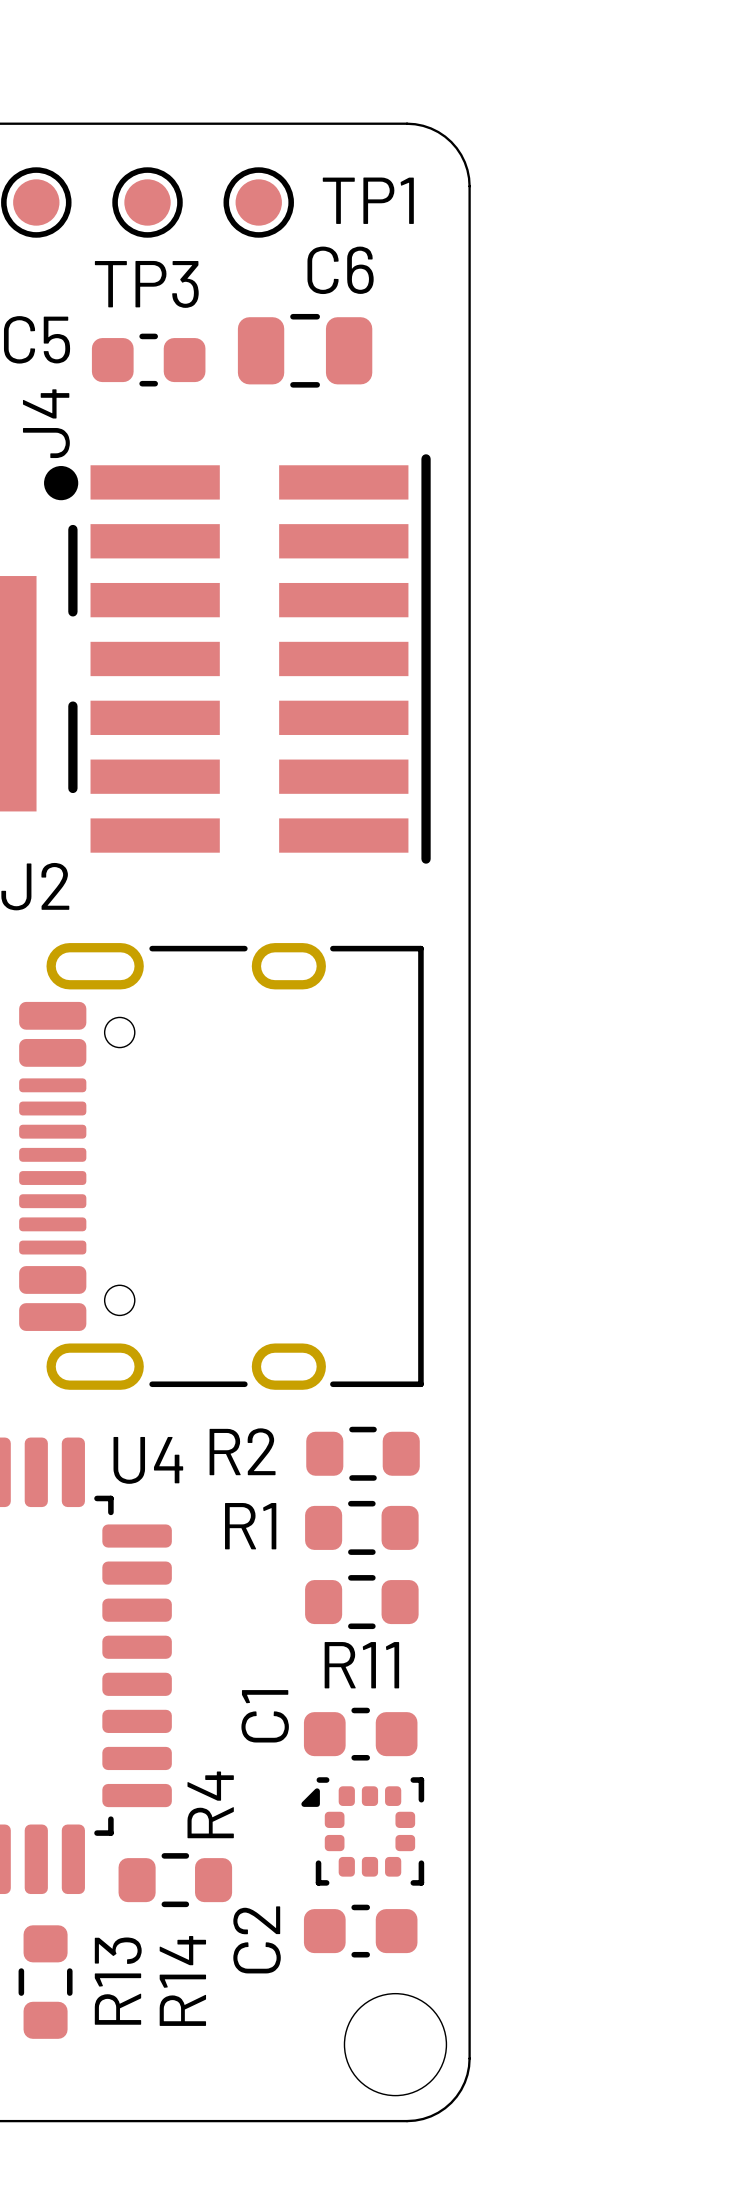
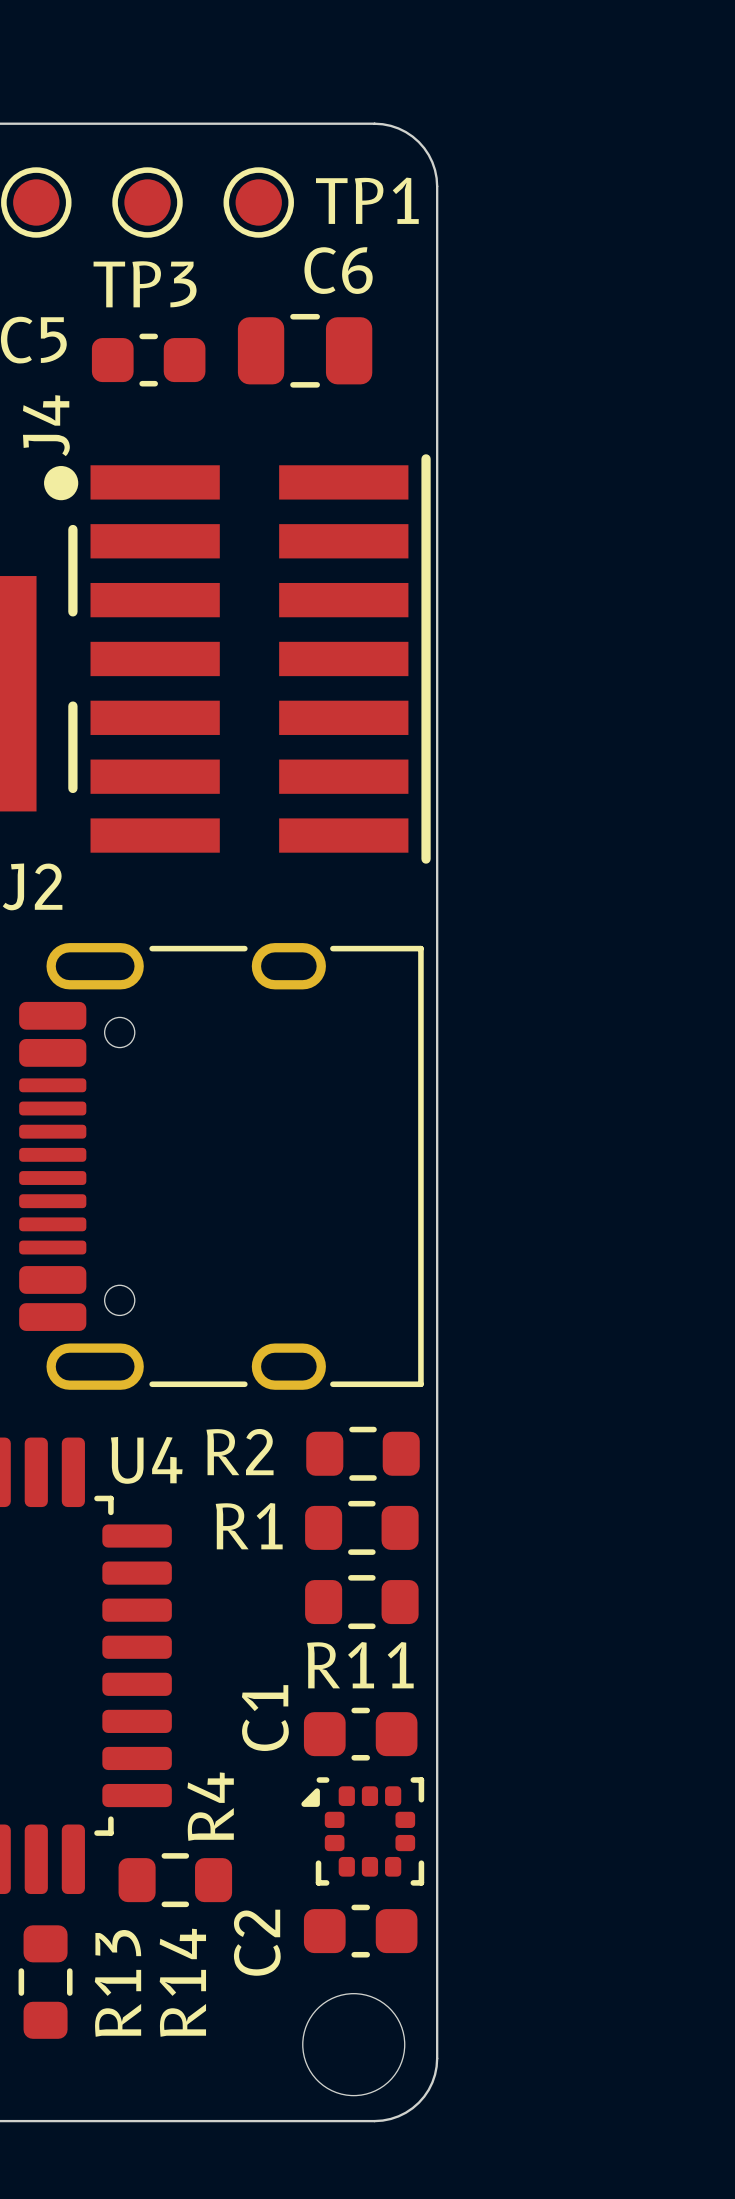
board edge: (374, 123) (415, 124) (438, 132) (451, 142) (461, 155) (467, 170) (469, 186) (469, 2058) (467, 2074) (461, 2089) (451, 2102) (438, 2112) (415, 2120) (374, 2121) -> (374, 123) (398, 128) (418, 142) (432, 162) (437, 186) (437, 2058) (432, 2082) (418, 2102) (398, 2116) (374, 2121)
round board edge position: (395, 2044) -> (353, 2044)

